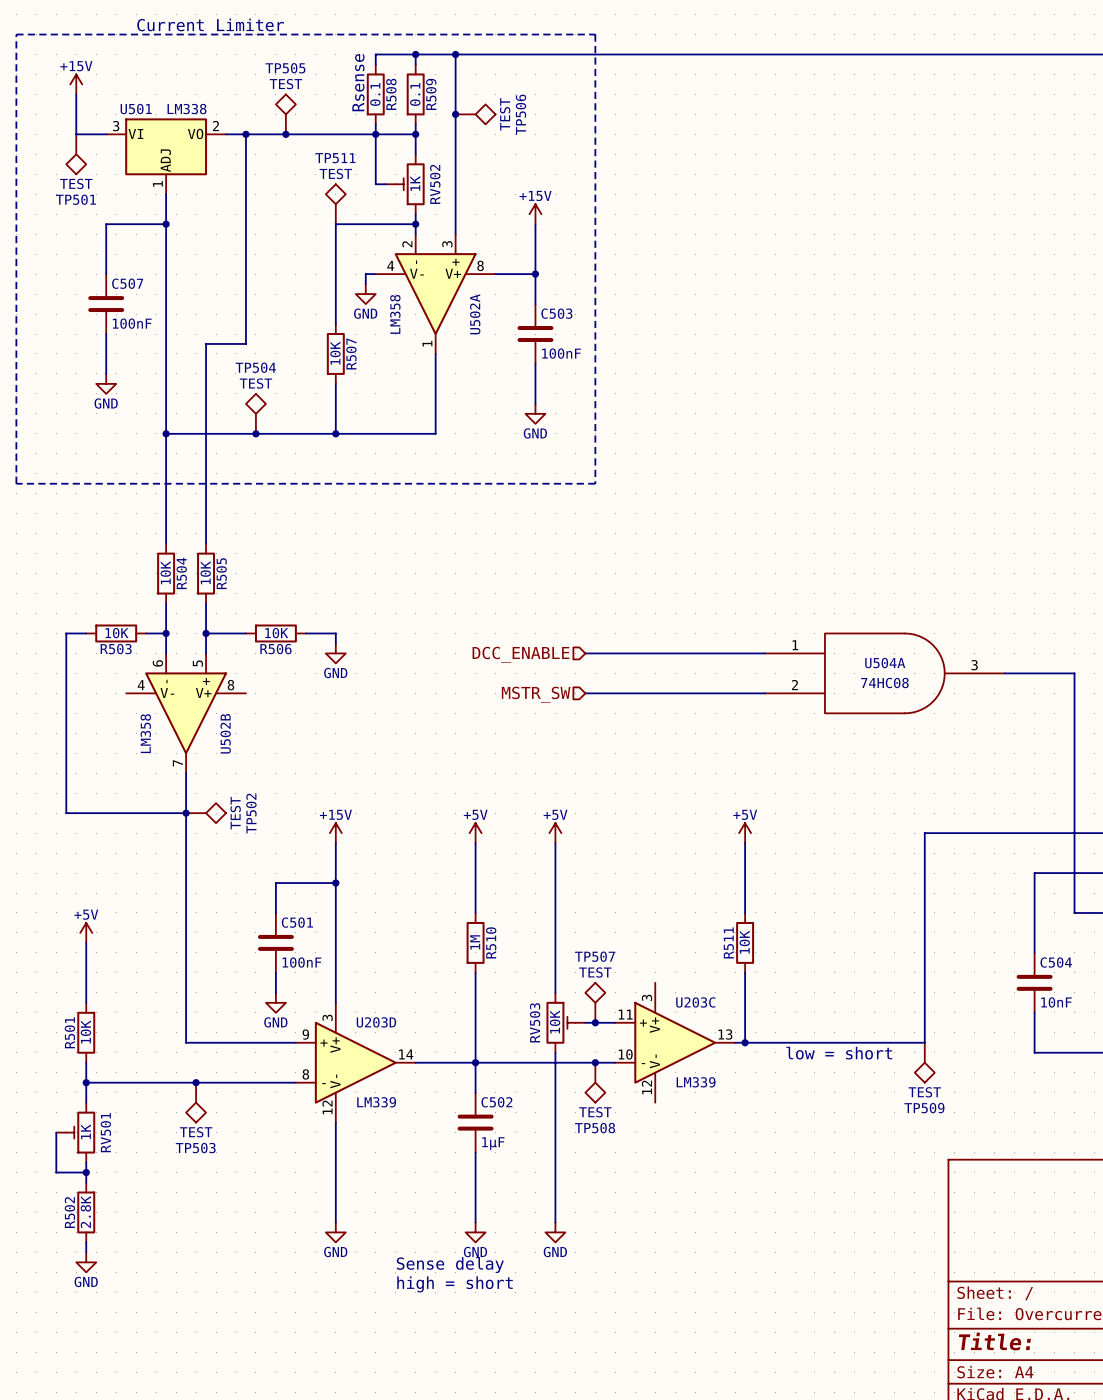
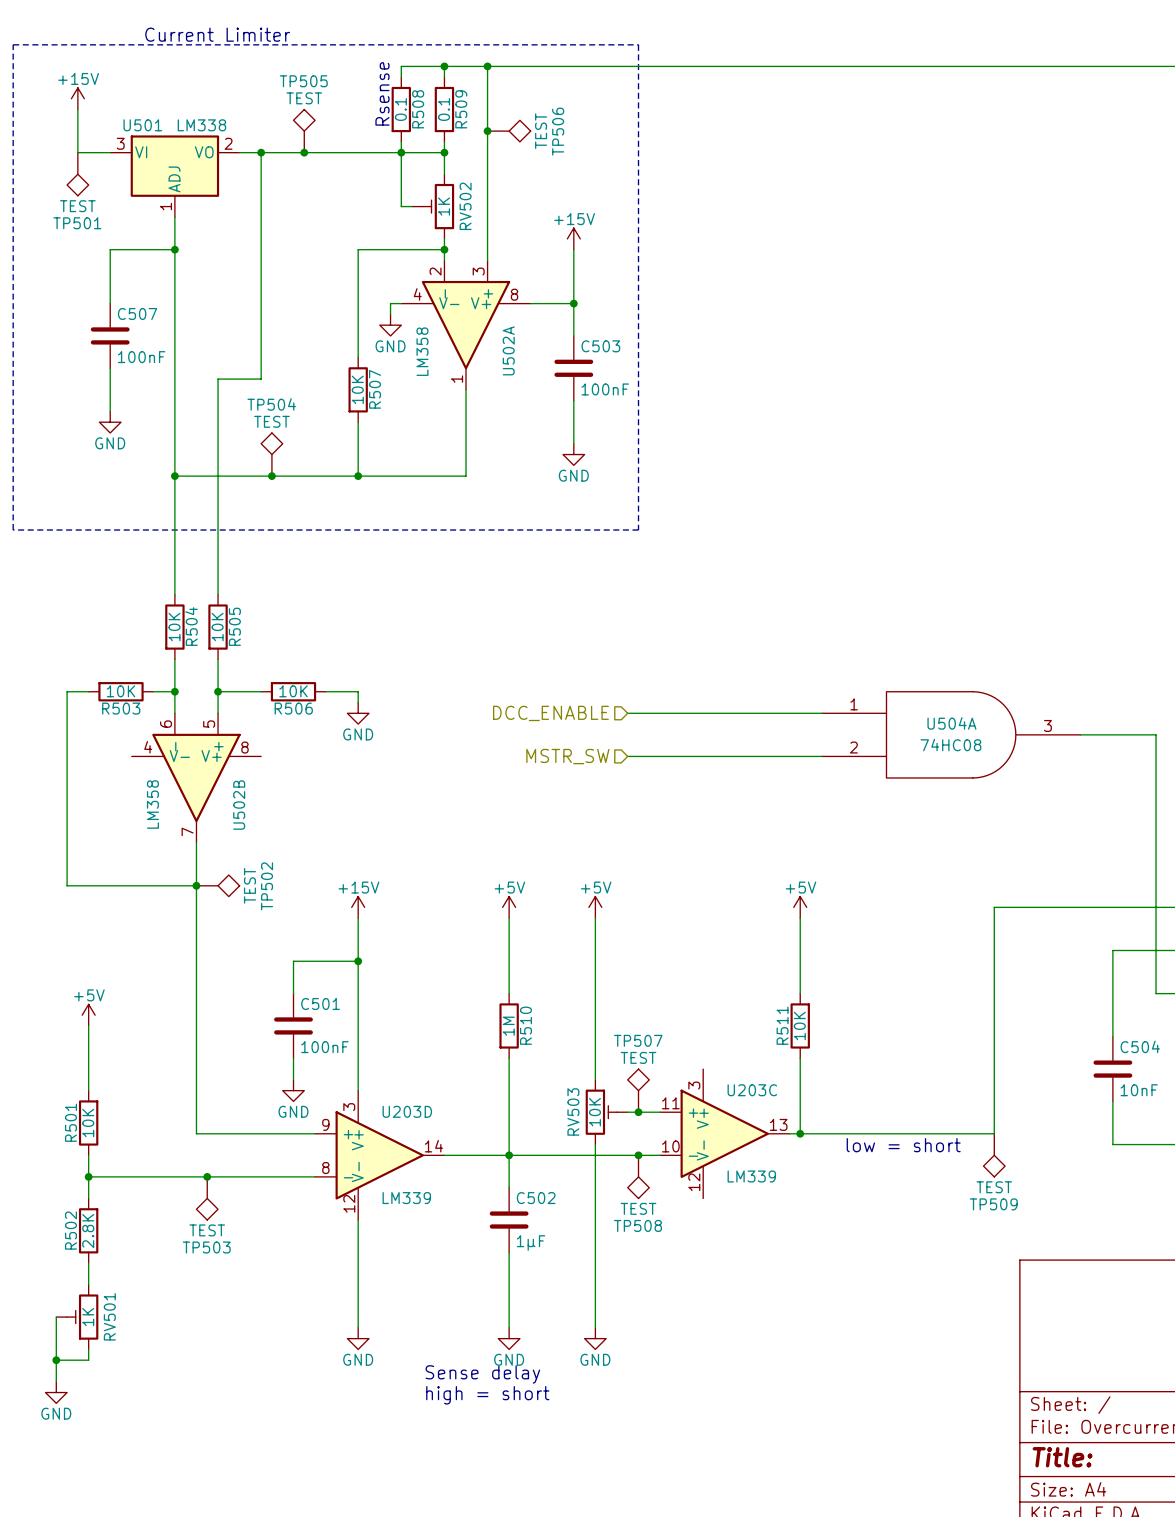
TP511: TEST (335, 204) -> none
wire: (56, 1132) (56, 1172) (86, 1172) -> none
RV501 position: (75, 1132) -> (77, 1317)
junction: (86, 1172) -> none
wire: none -> (56, 1317) (56, 1381)
R502 position: (86, 1212) -> (88, 1230)
wire: none -> (56, 1360) (88, 1360)
junction: none -> (56, 1360)
power symbol position: GND (86, 1262) -> GND (56, 1392)

